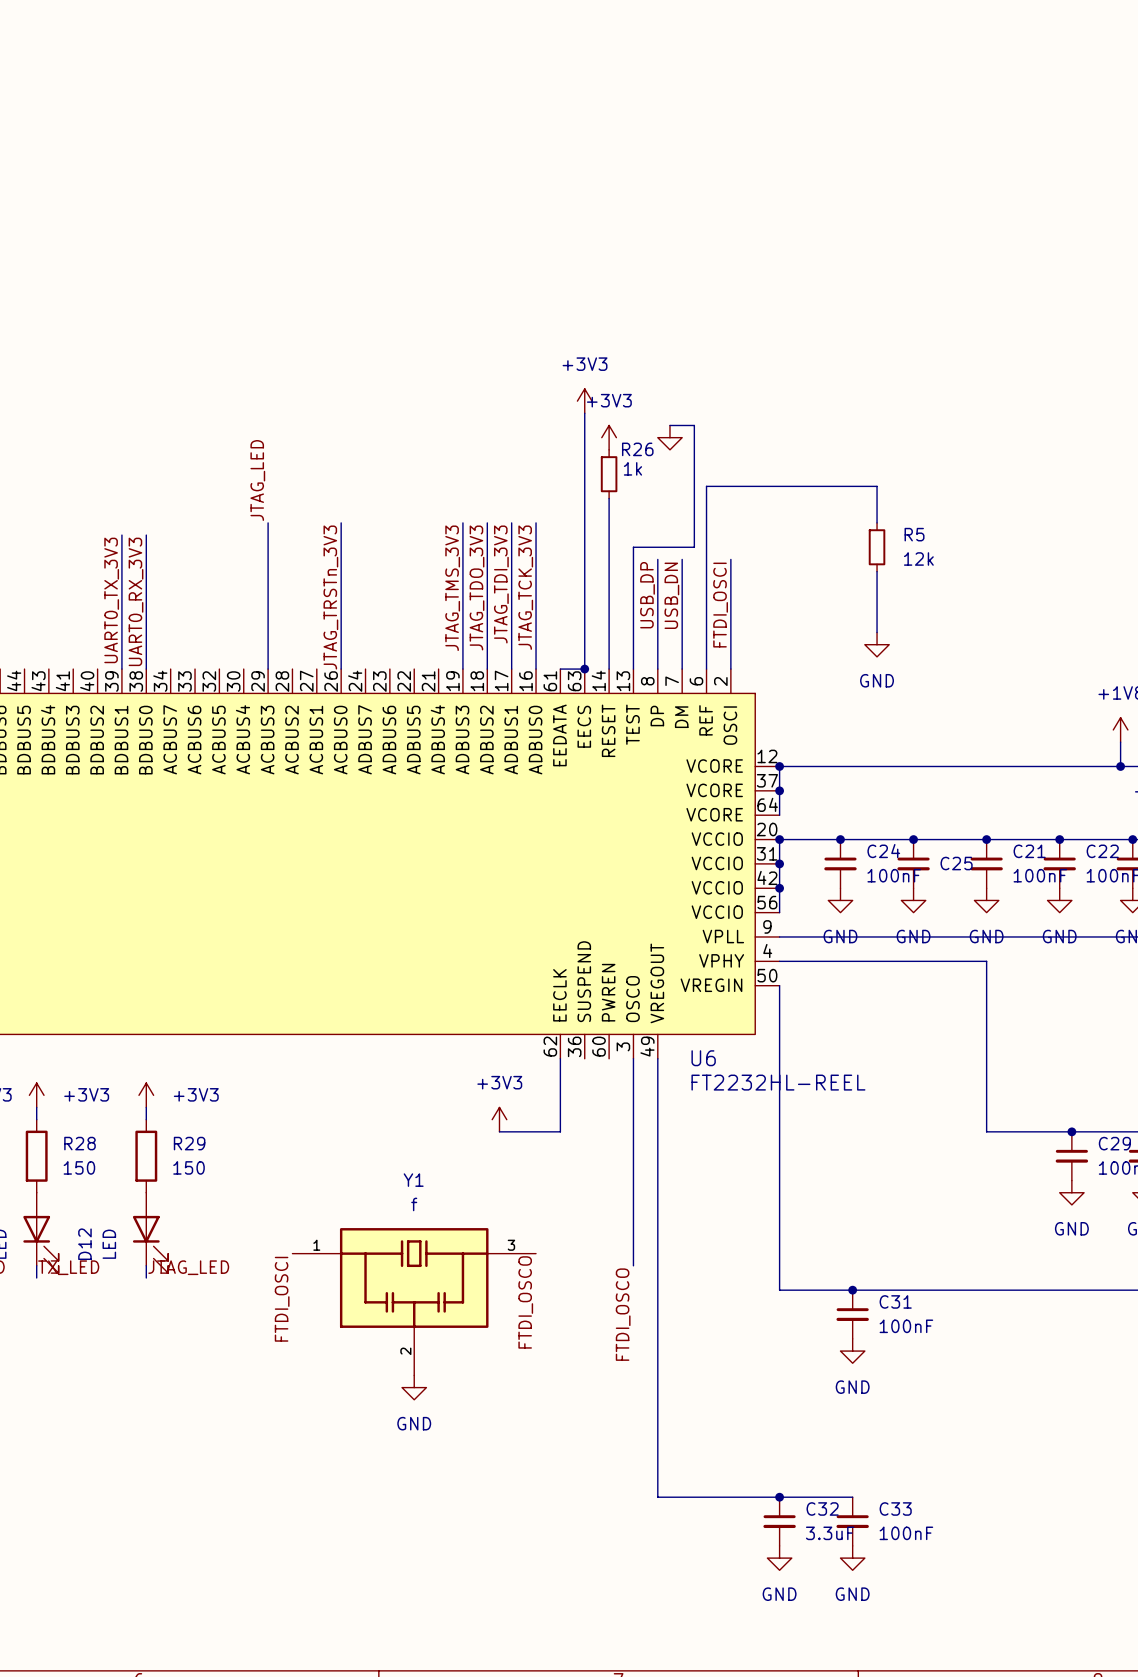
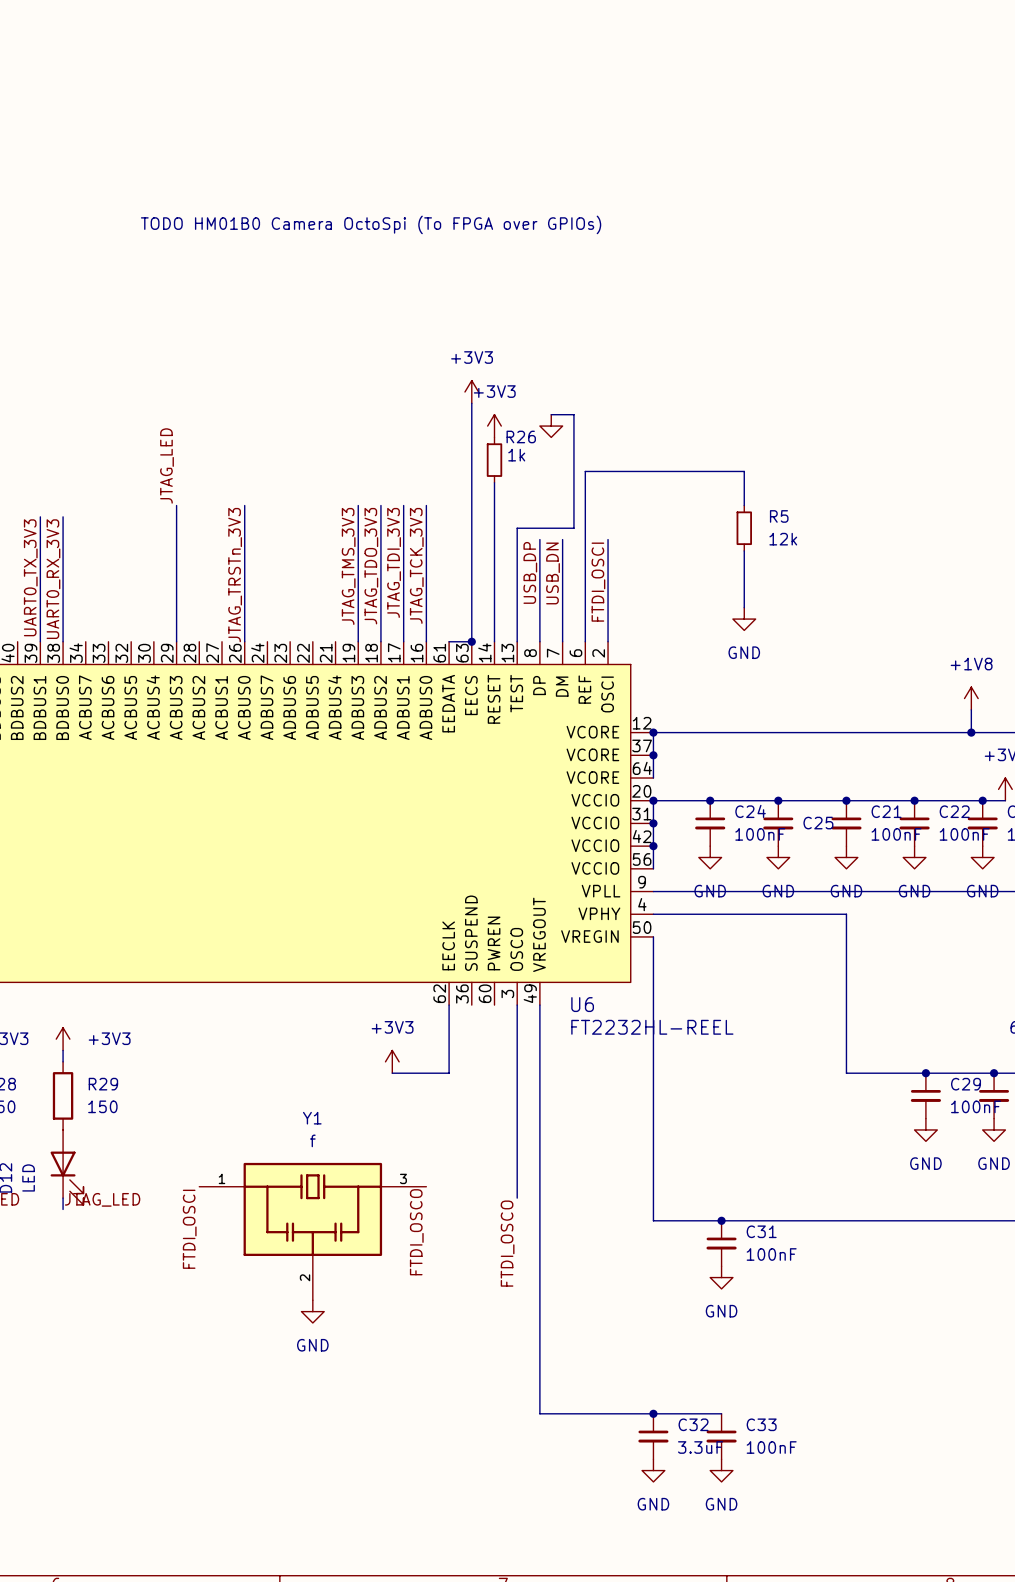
text: none -> TODO HM01B0 Camera OctoSpi (To FPGA over GPIOs) (371, 224)

